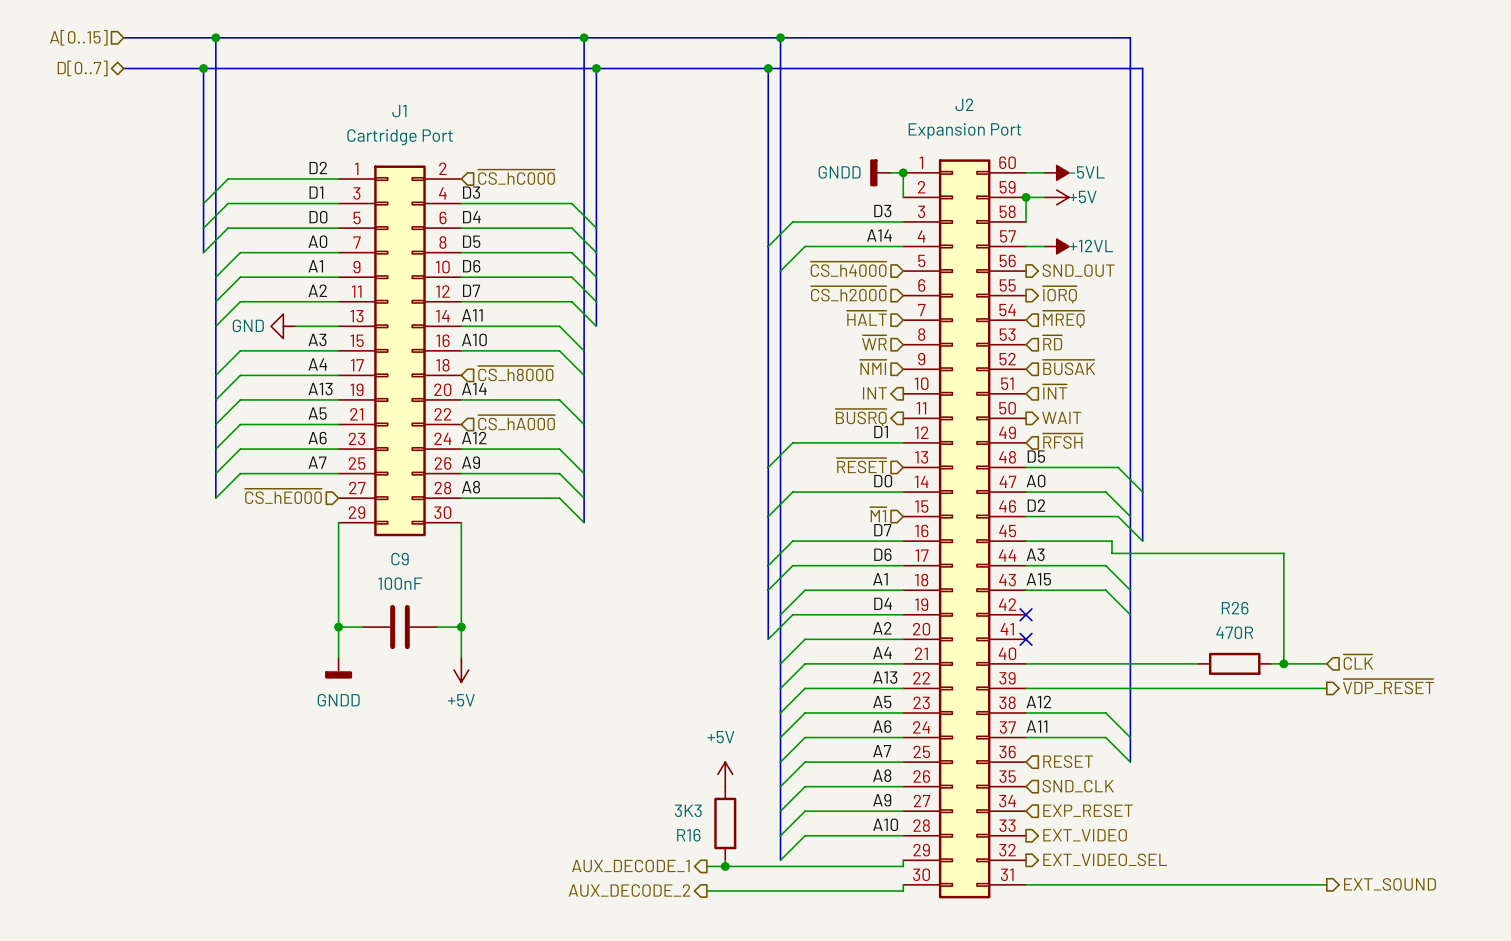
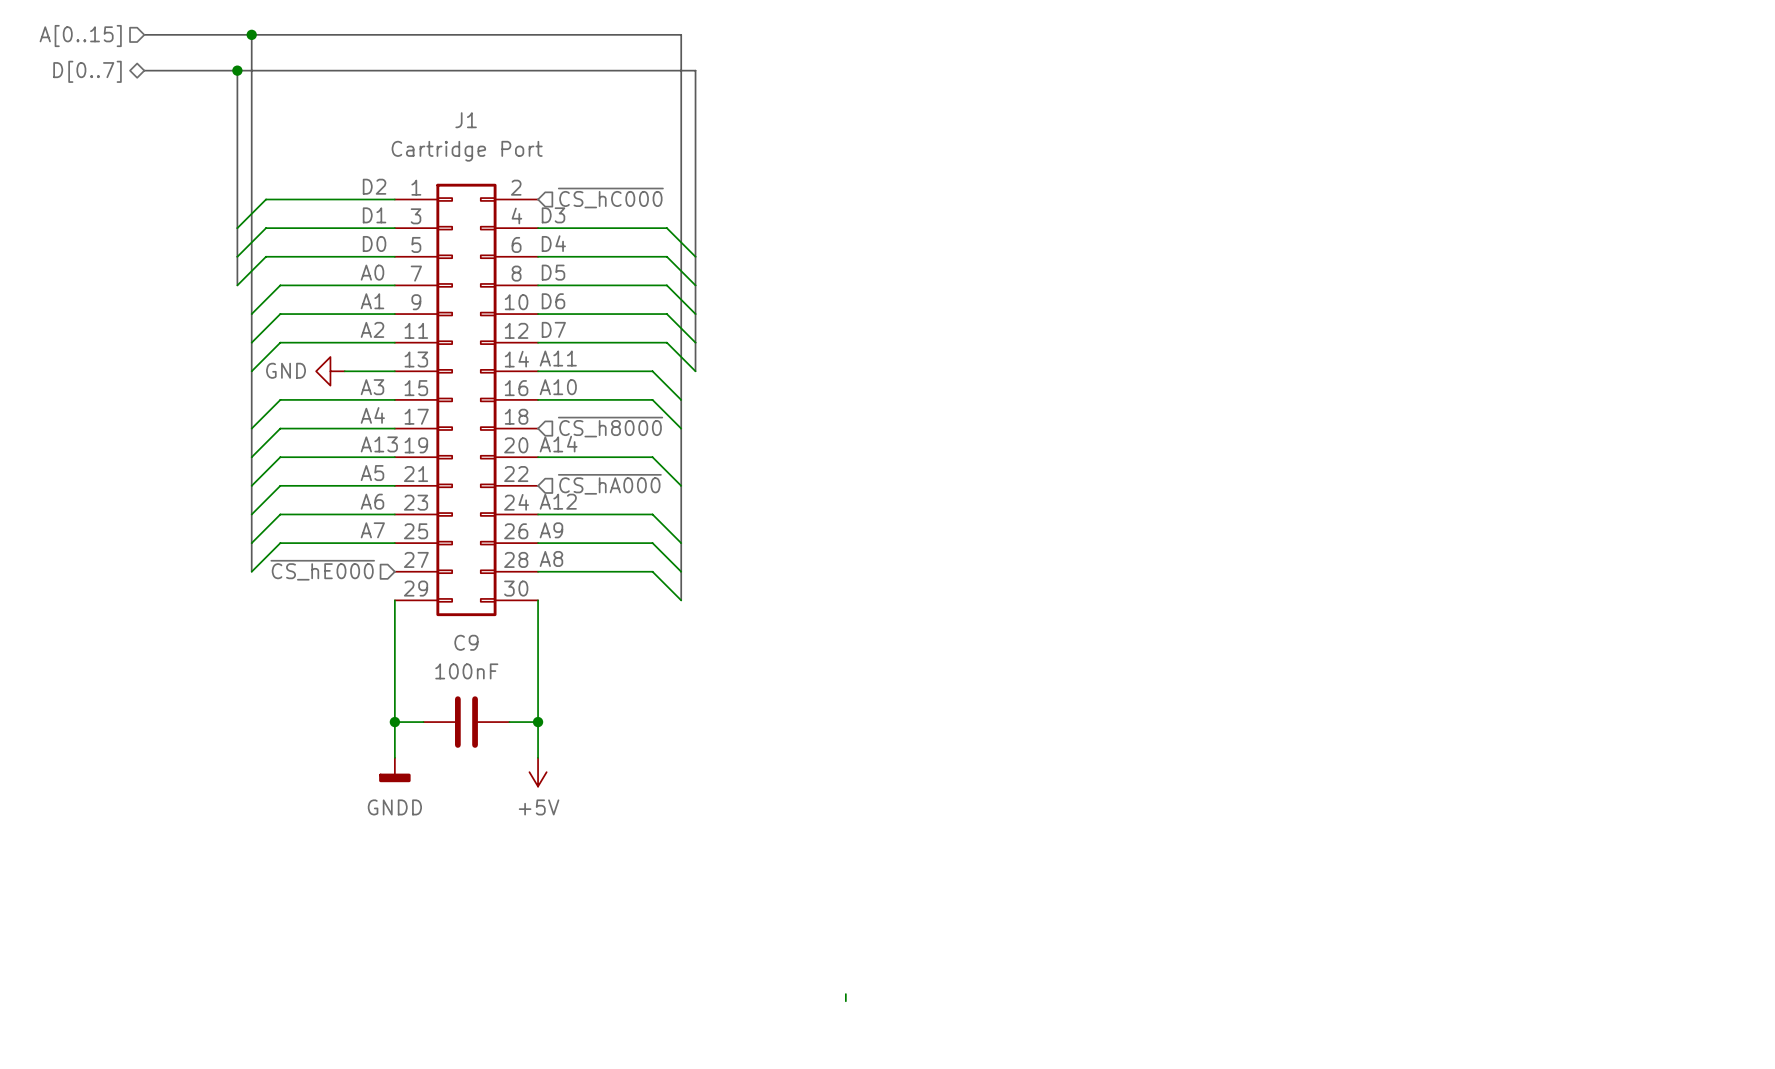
bus: (584, 37) (1130, 37) (1130, 762) -> none
junction: (584, 37) -> none
bus: (780, 37) (780, 860) -> none
junction: (780, 37) -> none
bus: (596, 68) (1142, 68) (1142, 541) -> none
junction: (596, 68) -> none
bus: (768, 68) (768, 639) -> none
junction: (768, 68) -> none
power symbol: GNDD (880, 172) -> none
wire: (891, 172) (903, 172) (903, 197) -> none
junction: (903, 172) -> none
wire: (1026, 172) (1044, 172) -> none
power symbol: -5VL (1056, 172) -> none
junction: (1026, 197) -> none
wire: (1044, 197) (1026, 197) (1026, 221) -> none
power symbol: +5V (1056, 197) -> none
label: D3 (882, 211) -> none
wire: (903, 221) (792, 221) (768, 246) -> none
label: A14 (879, 235) -> none
wire: (903, 246) (805, 246) (780, 271) -> none
wire: (1026, 246) (1044, 246) -> none
power symbol: +12VL (1056, 246) -> none
hierarchical label: ~{CS_h4000} (848, 269) -> none
hierarchical label: SND_OUT (1078, 270) -> none
hierarchical label: ~{CS_h2000} (848, 293) -> none
hierarchical label: ~{IORQ} (1059, 294) -> none
hierarchical label: ~{HALT} (866, 318) -> none
hierarchical label: ~{MREQ} (1063, 319) -> none
hierarchical label: ~{WR} (874, 342) -> none
hierarchical label: ~{RD} (1052, 342) -> none
hierarchical label: ~{NMI} (873, 367) -> none
hierarchical label: ~{BUSAK} (1068, 367) -> none
hierarchical label: ~{INT} (1055, 391) -> none
hierarchical label: INT (874, 393) -> none
hierarchical label: ~{BUSRQ} (861, 417) -> none
hierarchical label: WAIT (1061, 417) -> none
label: D1 (881, 431) -> none
hierarchical label: ~{RFSH} (1062, 441) -> none
wire: (903, 442) (792, 442) (768, 467) -> none
label: D5 (1036, 456) -> none
hierarchical label: ~{RESET} (861, 465) -> none
wire: (1026, 467) (1118, 467) (1142, 492) -> none
label: D0 (883, 481) -> none
label: A0 (1035, 481) -> none
wire: (903, 492) (792, 492) (768, 516) -> none
wire: (1026, 492) (1105, 492) (1130, 516) -> none
label: D2 (1036, 505) -> none
hierarchical label: ~{M1} (878, 514) -> none
wire: (1026, 516) (1118, 516) (1142, 541) -> none
J2: Expansion Port (964, 528) -> none
label: D7 (882, 530) -> none
wire: (903, 541) (792, 541) (768, 565) -> none
wire: (1026, 541) (1111, 541) (1111, 553) (1283, 553) (1283, 663) -> none
label: D6 (882, 554) -> none
label: A3 (1035, 554) -> none
wire: (903, 565) (792, 565) (768, 590) -> none
wire: (1026, 565) (1105, 565) (1130, 590) -> none
label: A1 (880, 579) -> none
label: A15 (1038, 579) -> none
wire: (903, 590) (805, 590) (780, 614) -> none
wire: (1026, 590) (1105, 590) (1130, 614) -> none
label: D4 (883, 603) -> none
wire: (903, 614) (792, 614) (768, 639) -> none
no-connect mark: (1026, 614) -> none
label: A2 (882, 628) -> none
wire: (903, 639) (805, 639) (780, 663) -> none
no-connect mark: (1026, 639) -> none
label: A4 (882, 652) -> none
hierarchical label: ~{CLK} (1358, 662) -> none
wire: (903, 663) (805, 663) (780, 688) -> none
wire: (1026, 663) (1197, 663) -> none
R26: 470R (1234, 663) -> none
wire: (1271, 663) (1326, 663) -> none
junction: (1283, 663) -> none
label: A13 (885, 677) -> none
hierarchical label: ~{VDP_RESET} (1388, 686) -> none
wire: (903, 688) (805, 688) (780, 712) -> none
wire: (1026, 688) (1326, 688) -> none
label: A12 (1038, 701) -> none
label: A5 (882, 702) -> none
wire: (903, 712) (805, 712) (780, 737) -> none
wire: (1026, 712) (1105, 712) (1130, 737) -> none
label: A6 (882, 726) -> none
label: A11 (1036, 726) -> none
wire: (903, 737) (805, 737) (780, 762) -> none
wire: (1026, 737) (1105, 737) (1130, 762) -> none
label: A7 (882, 751) -> none
hierarchical label: RESET (1068, 761) -> none
wire: (903, 762) (805, 762) (780, 786) -> none
power symbol: +5V (725, 774) -> none
label: A8 (882, 775) -> none
wire: (903, 786) (805, 786) (780, 811) -> none
hierarchical label: SND_CLK (1078, 786) -> none
label: A9 (882, 800) -> none
hierarchical label: EXP_RESET (1088, 810) -> none
wire: (903, 811) (805, 811) (780, 835) -> none
R16: 3K3 (725, 823) -> none
label: A10 (885, 824) -> none
wire: (903, 835) (805, 835) (780, 860) -> none
hierarchical label: EXT_VIDEO (1085, 835) -> none
hierarchical label: EXT_VIDEO_SEL (1105, 859) -> none
wire: (903, 860) (903, 866) (706, 866) -> none
hierarchical label: AUX_DECODE_1 (630, 865) -> none
junction: (725, 866) -> none
wire: (903, 884) (903, 890) (706, 890) -> none
wire: (1026, 884) (1326, 884) -> none
hierarchical label: EXT_SOUND (1389, 884) -> none
hierarchical label: AUX_DECODE_2 (629, 890) -> none

